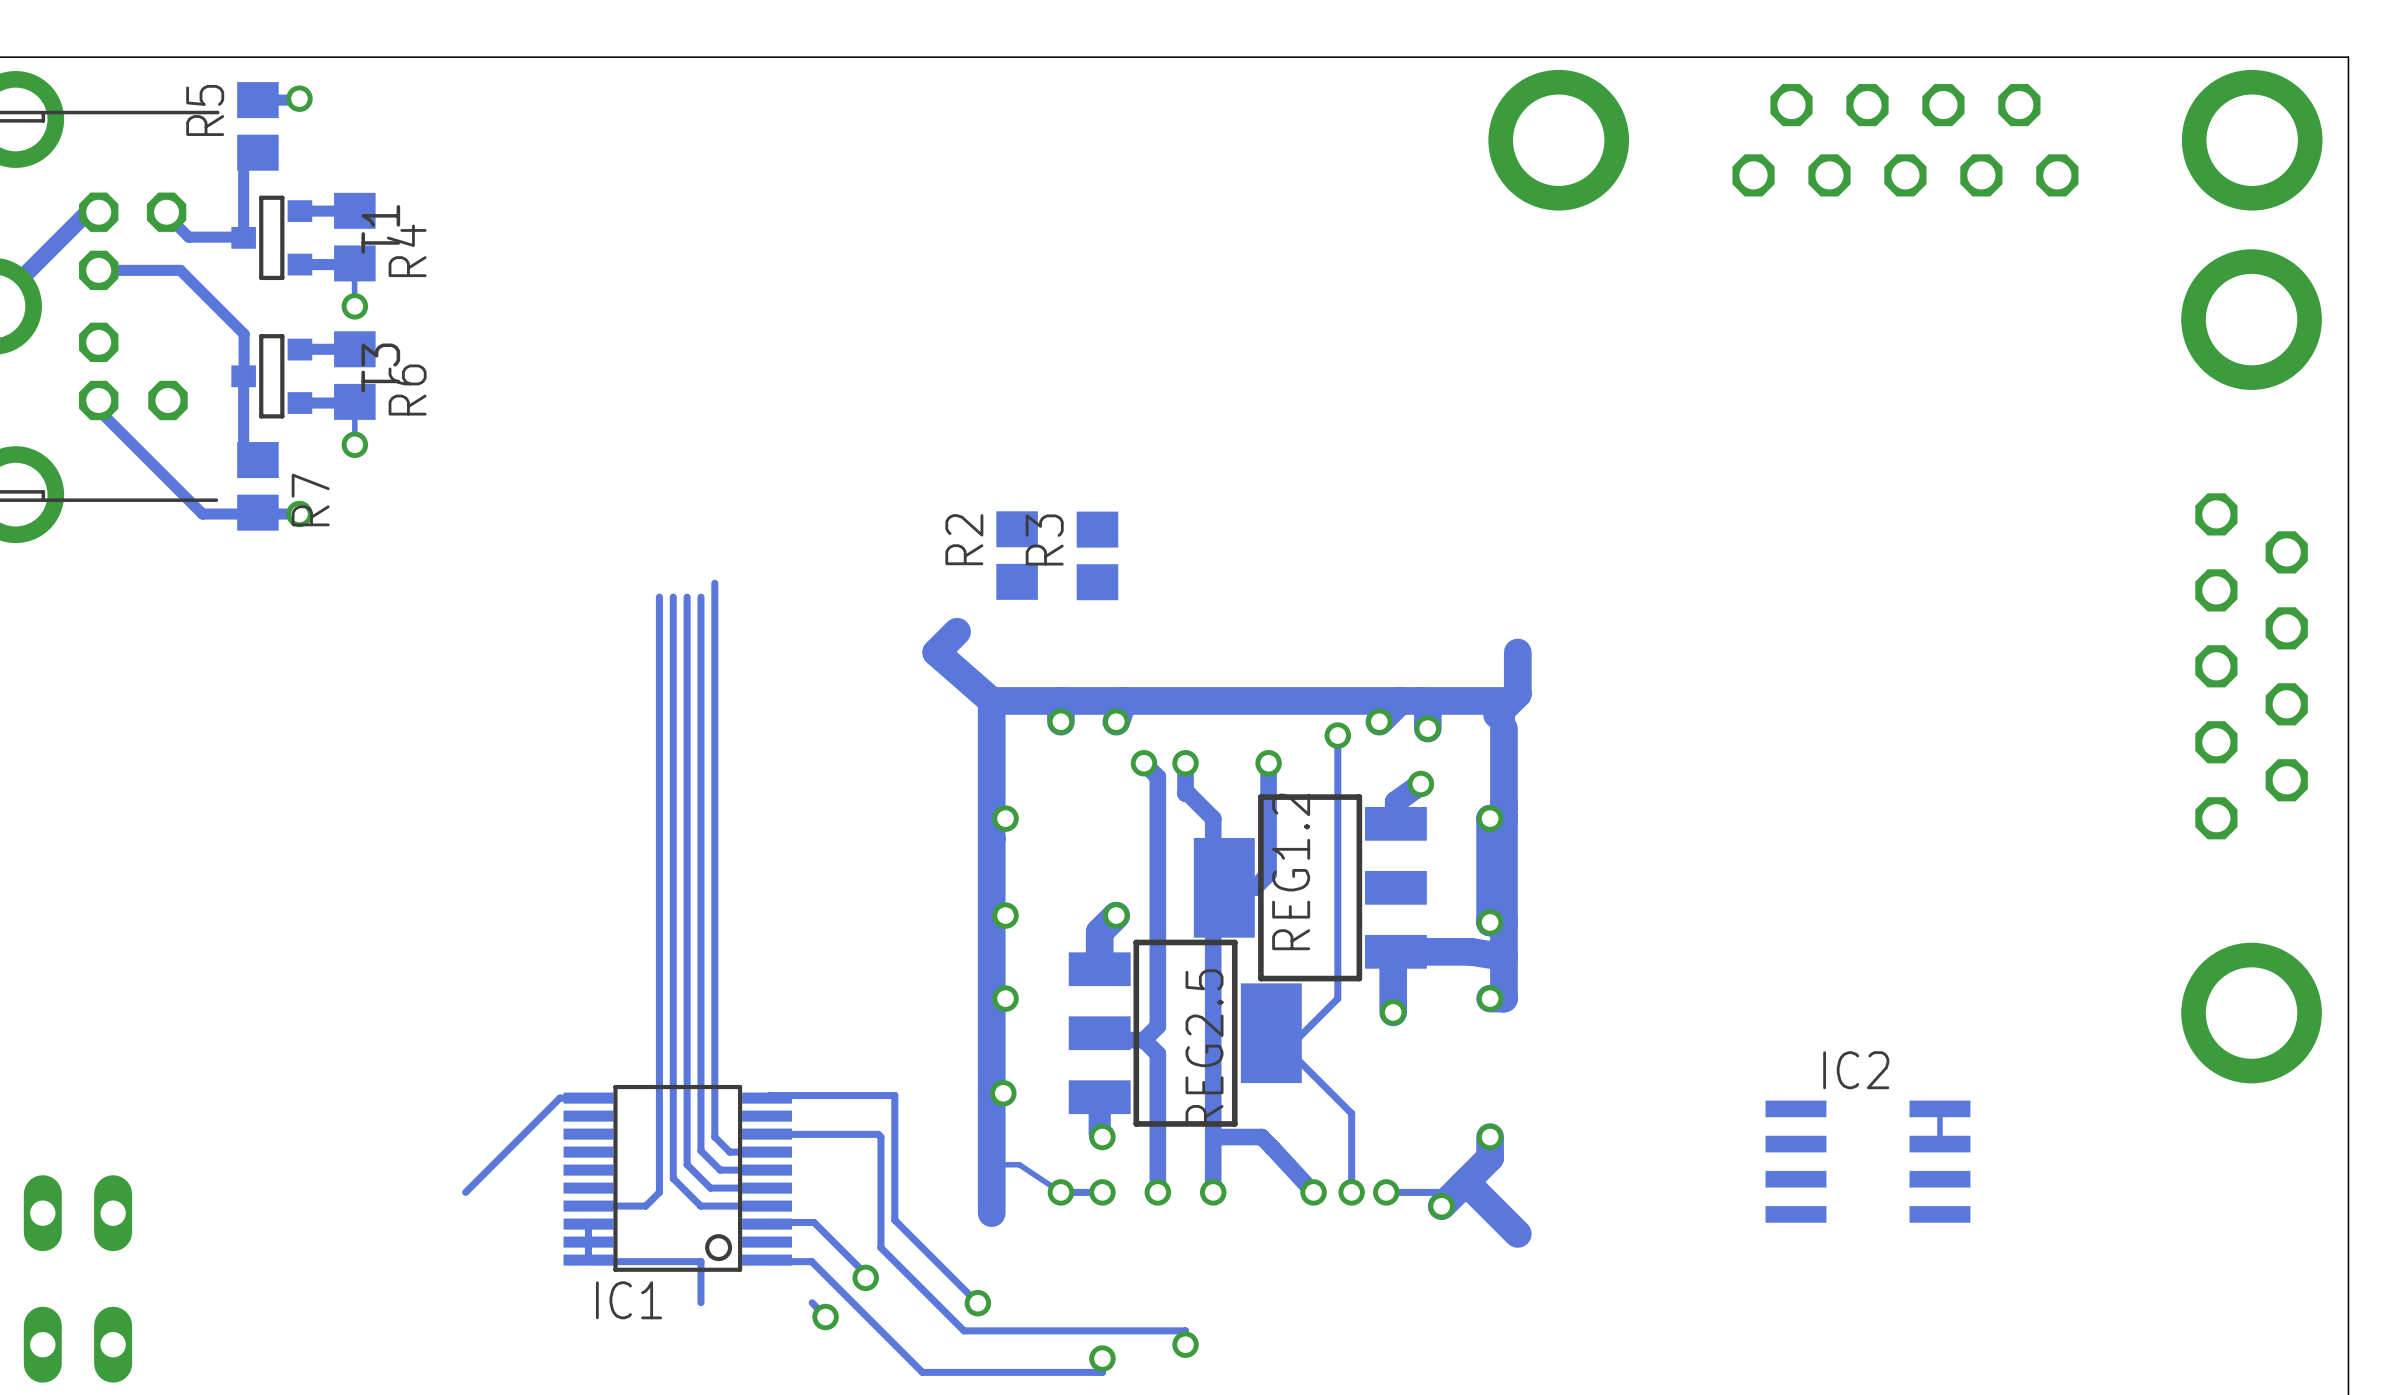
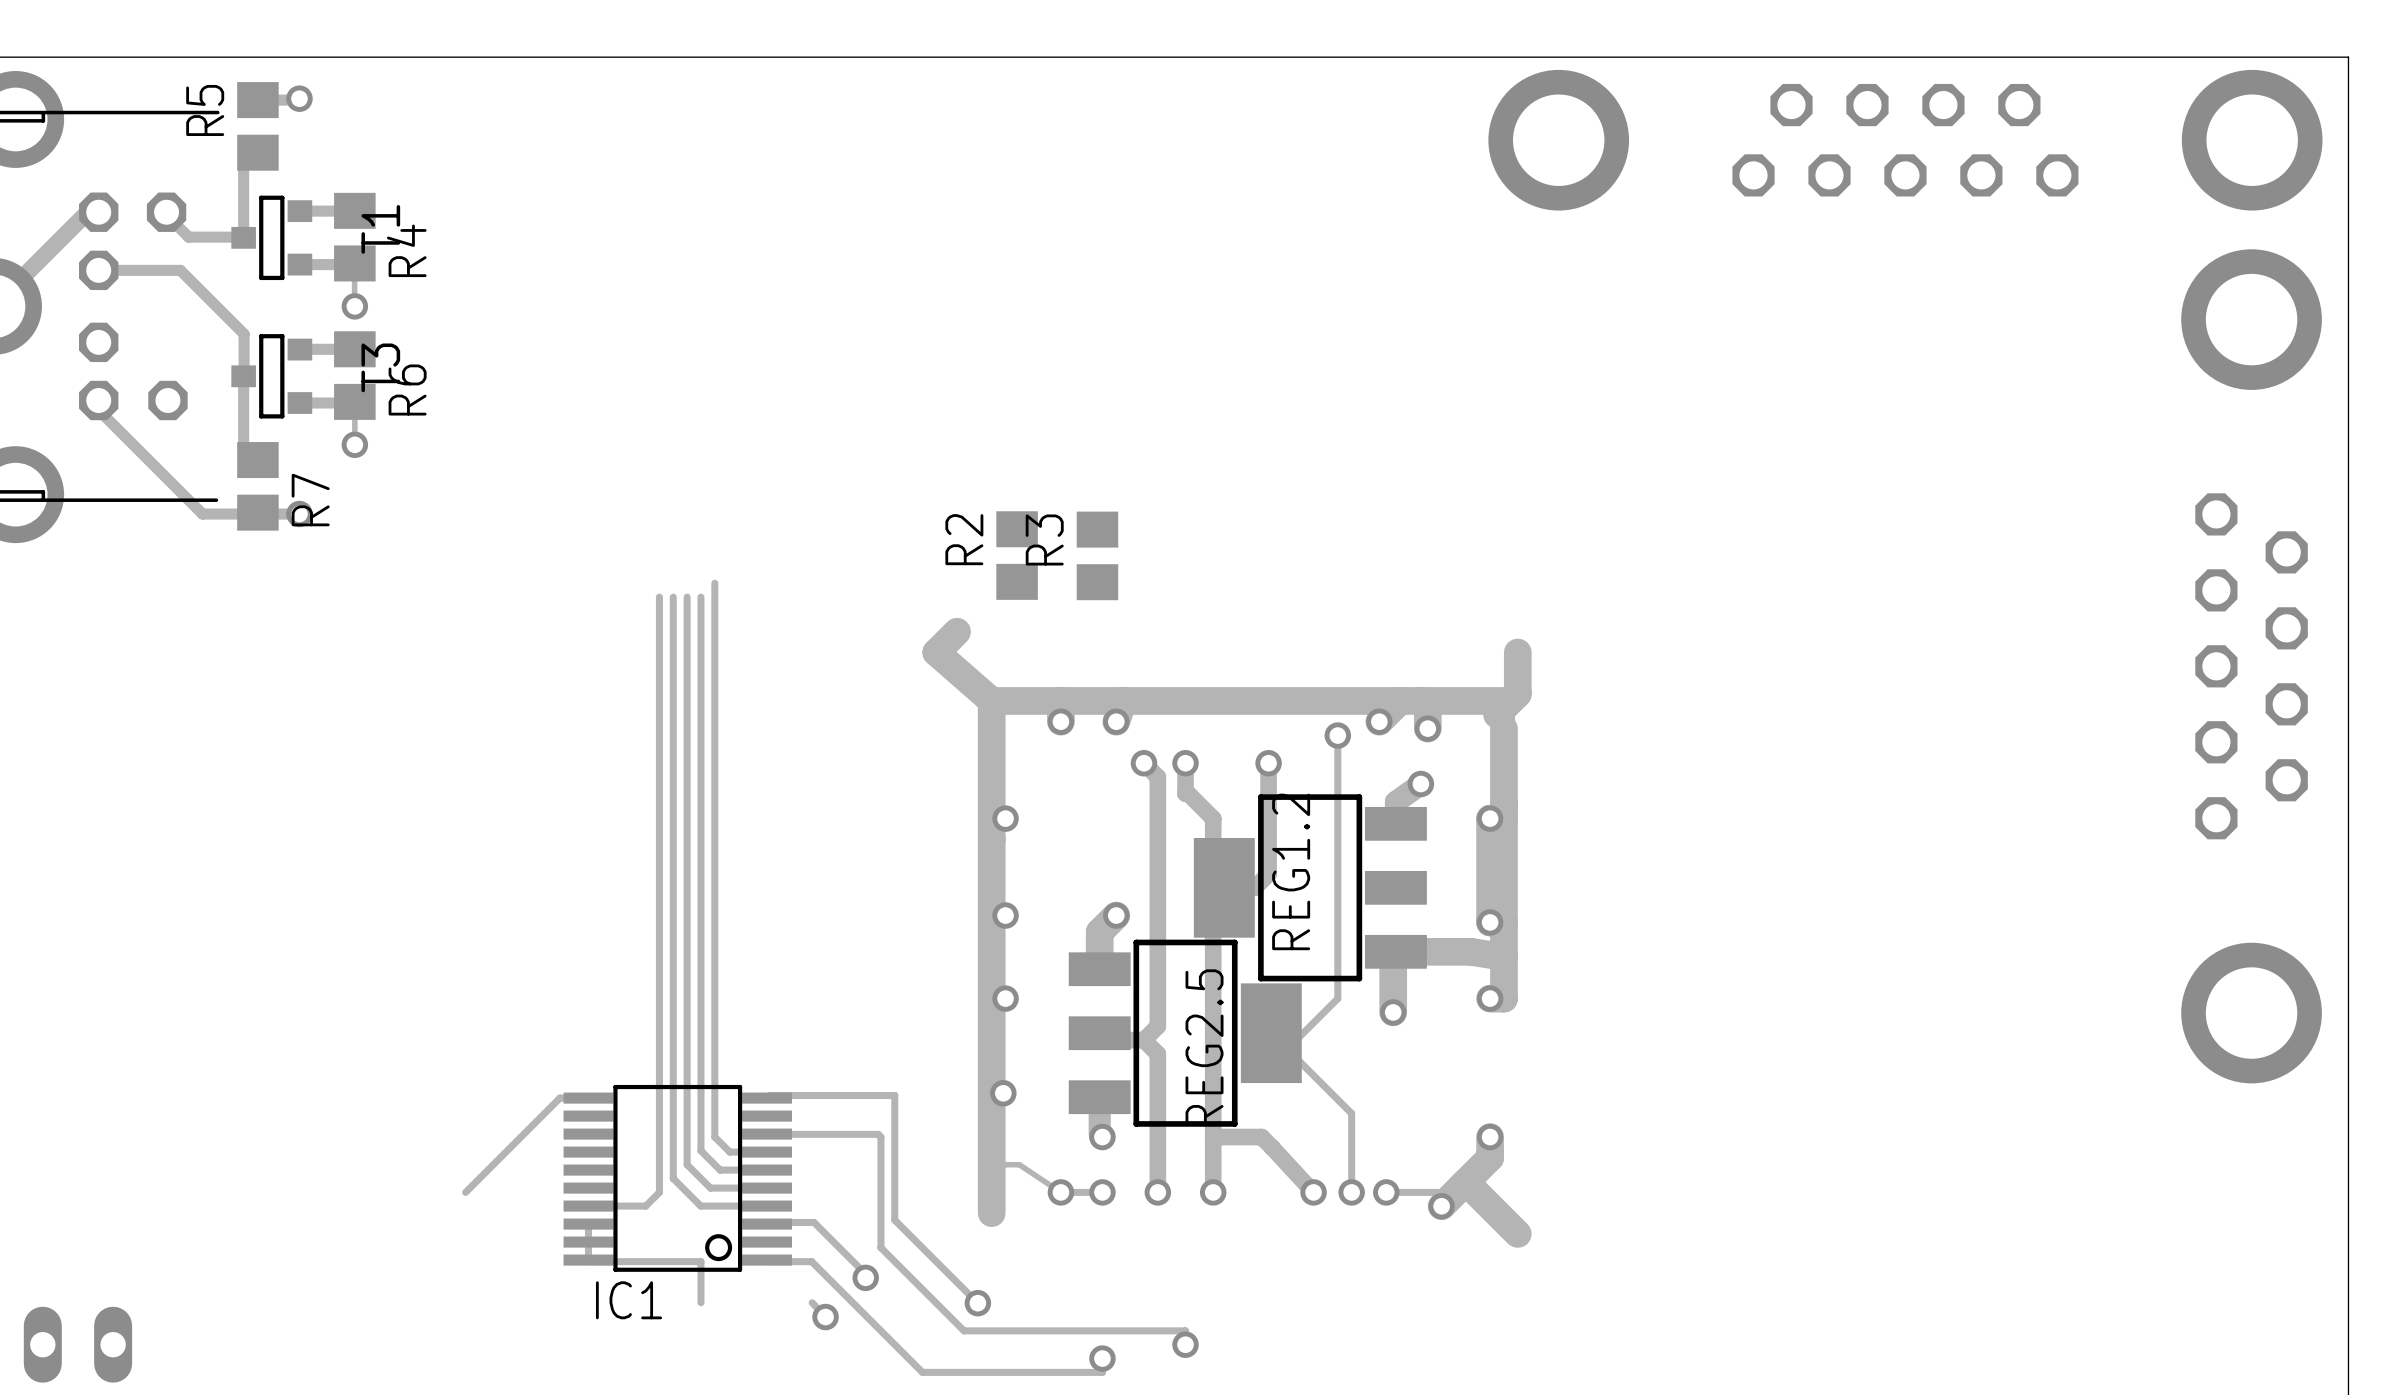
track: (1939, 1108) (1939, 1144) -> none
IC2: (1867, 1161) -> none
part: (77, 1213) -> none

